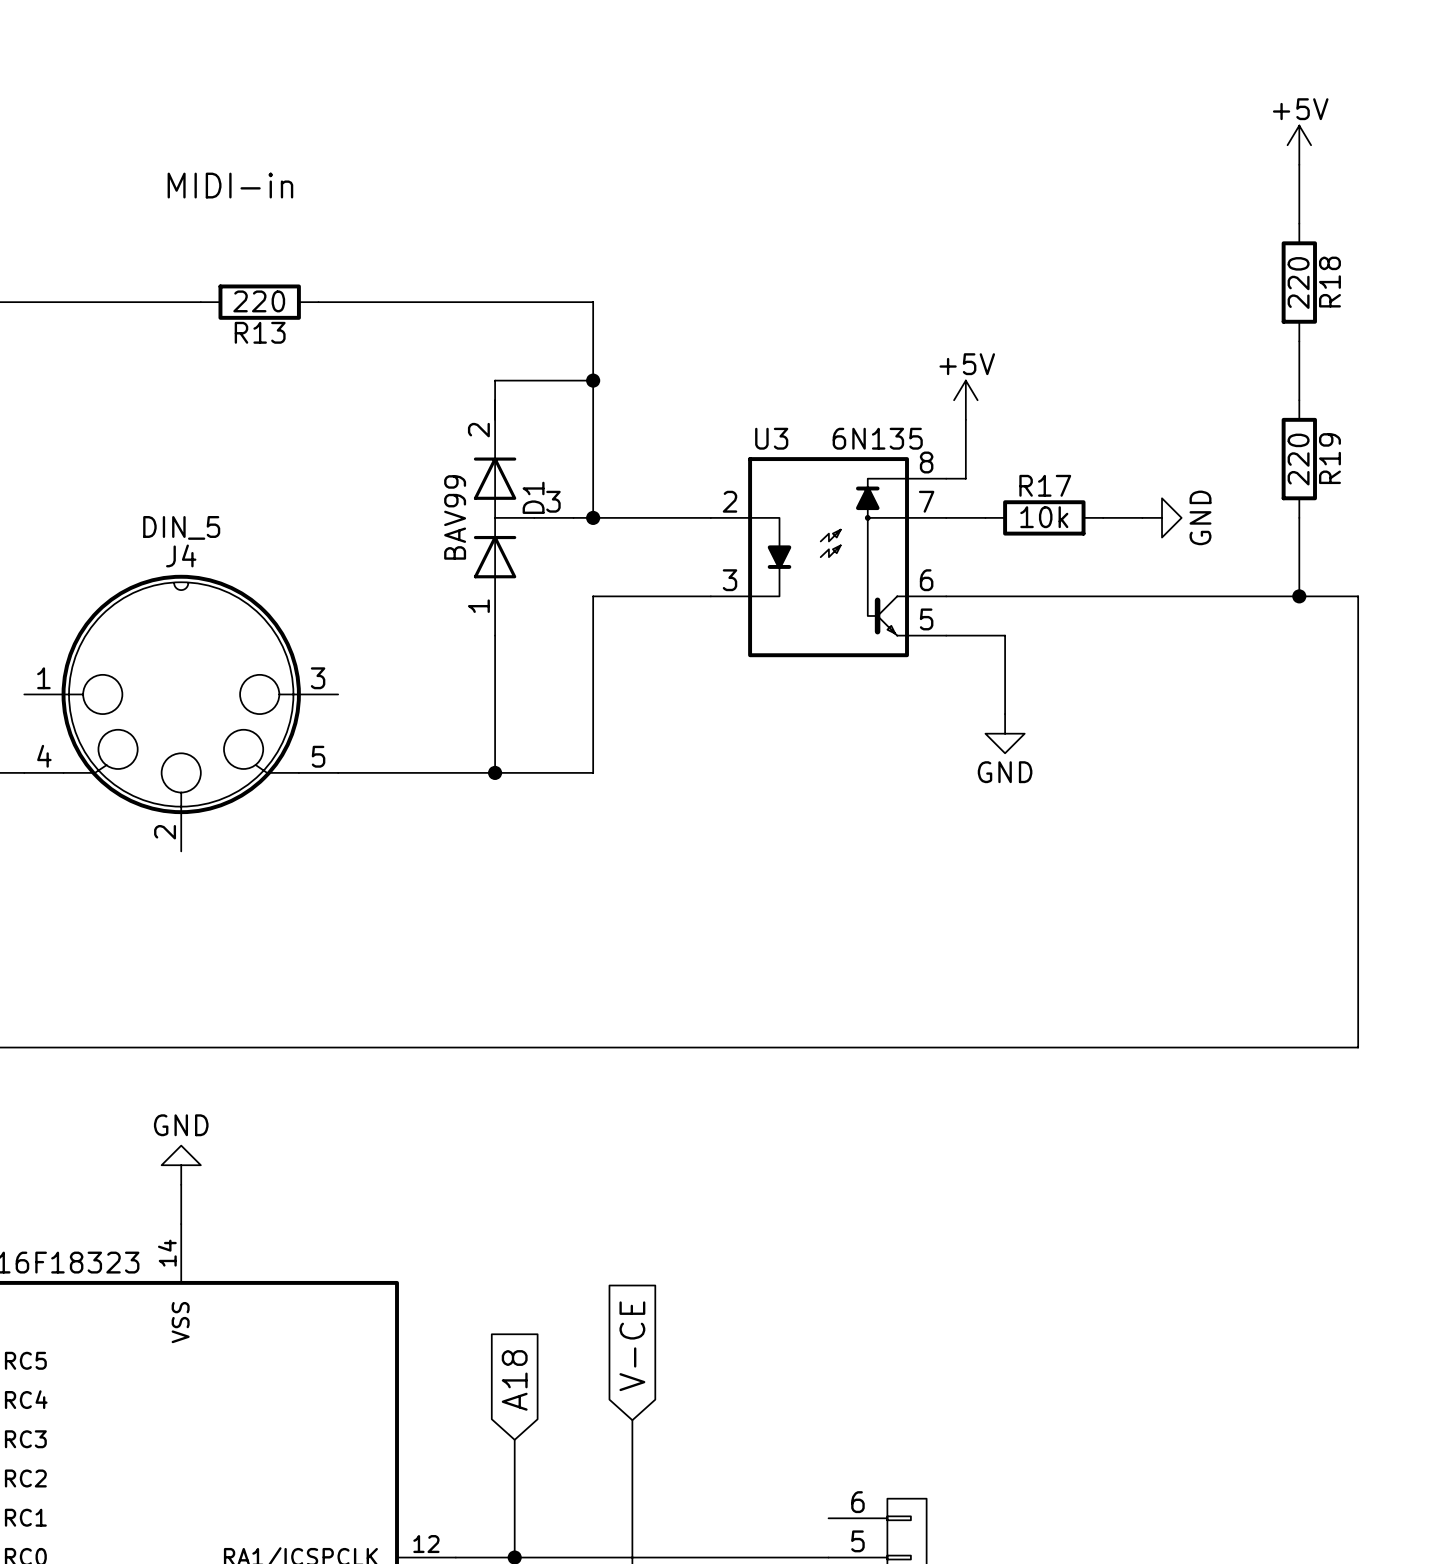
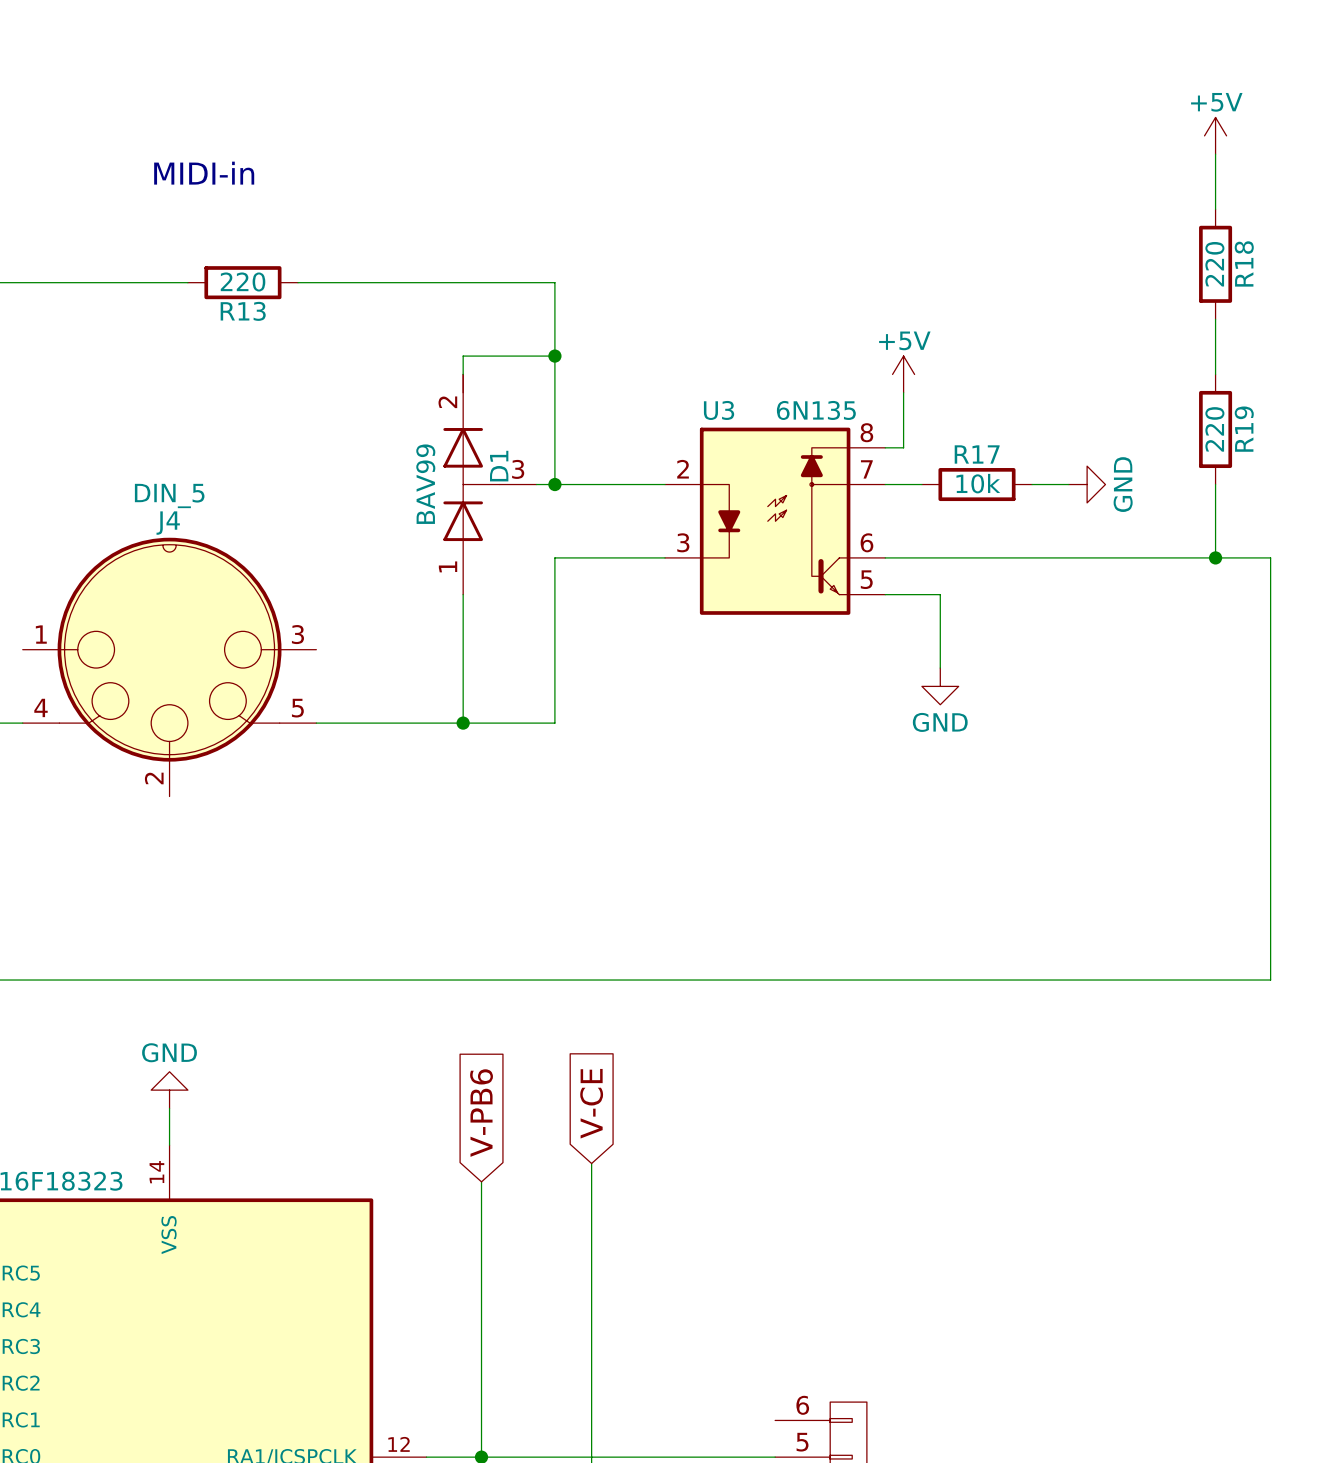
global label: none -> V-PB6 (481, 1113)
wire: none -> (591, 1163) (591, 1328)
wire: none -> (481, 1181) (481, 1347)
global label position: V-CE (632, 1346) -> V-CE (591, 1103)
global label: A18 (514, 1380) -> none

